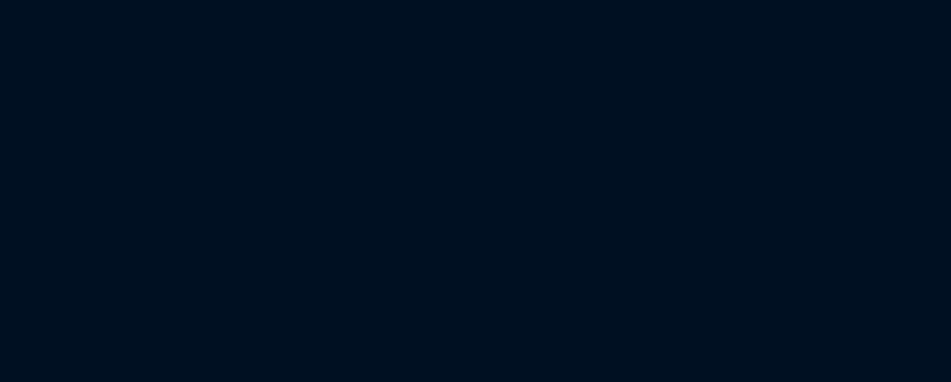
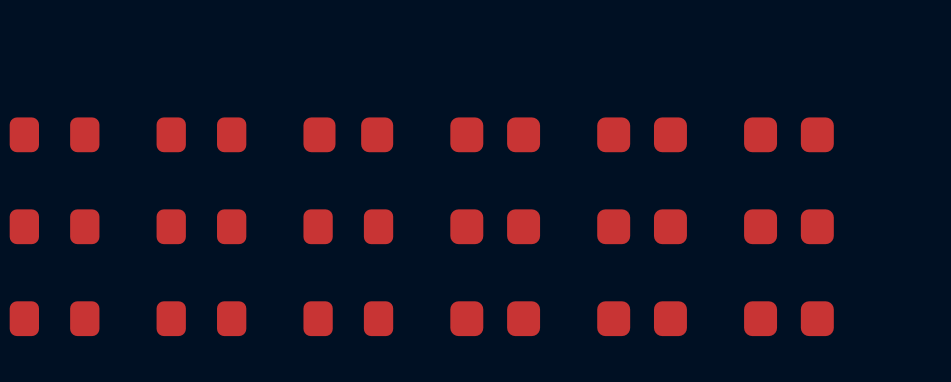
part: none -> (54, 134)
part: none -> (201, 134)
part: none -> (348, 134)
part: none -> (495, 134)
part: none -> (642, 134)
part: none -> (788, 134)
part: none -> (54, 226)
part: none -> (201, 226)
part: none -> (348, 226)
part: none -> (495, 226)
part: none -> (642, 226)
part: none -> (788, 226)
part: none -> (54, 318)
part: none -> (201, 318)
part: none -> (348, 318)
part: none -> (495, 318)
part: none -> (642, 318)
part: none -> (788, 318)

